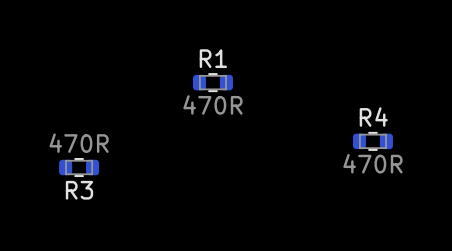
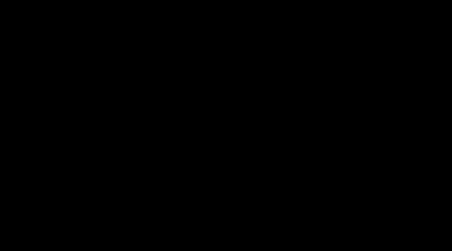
R1: 470R (212, 82) -> none
R4: 470R (372, 141) -> none
R3: 470R (79, 167) -> none

